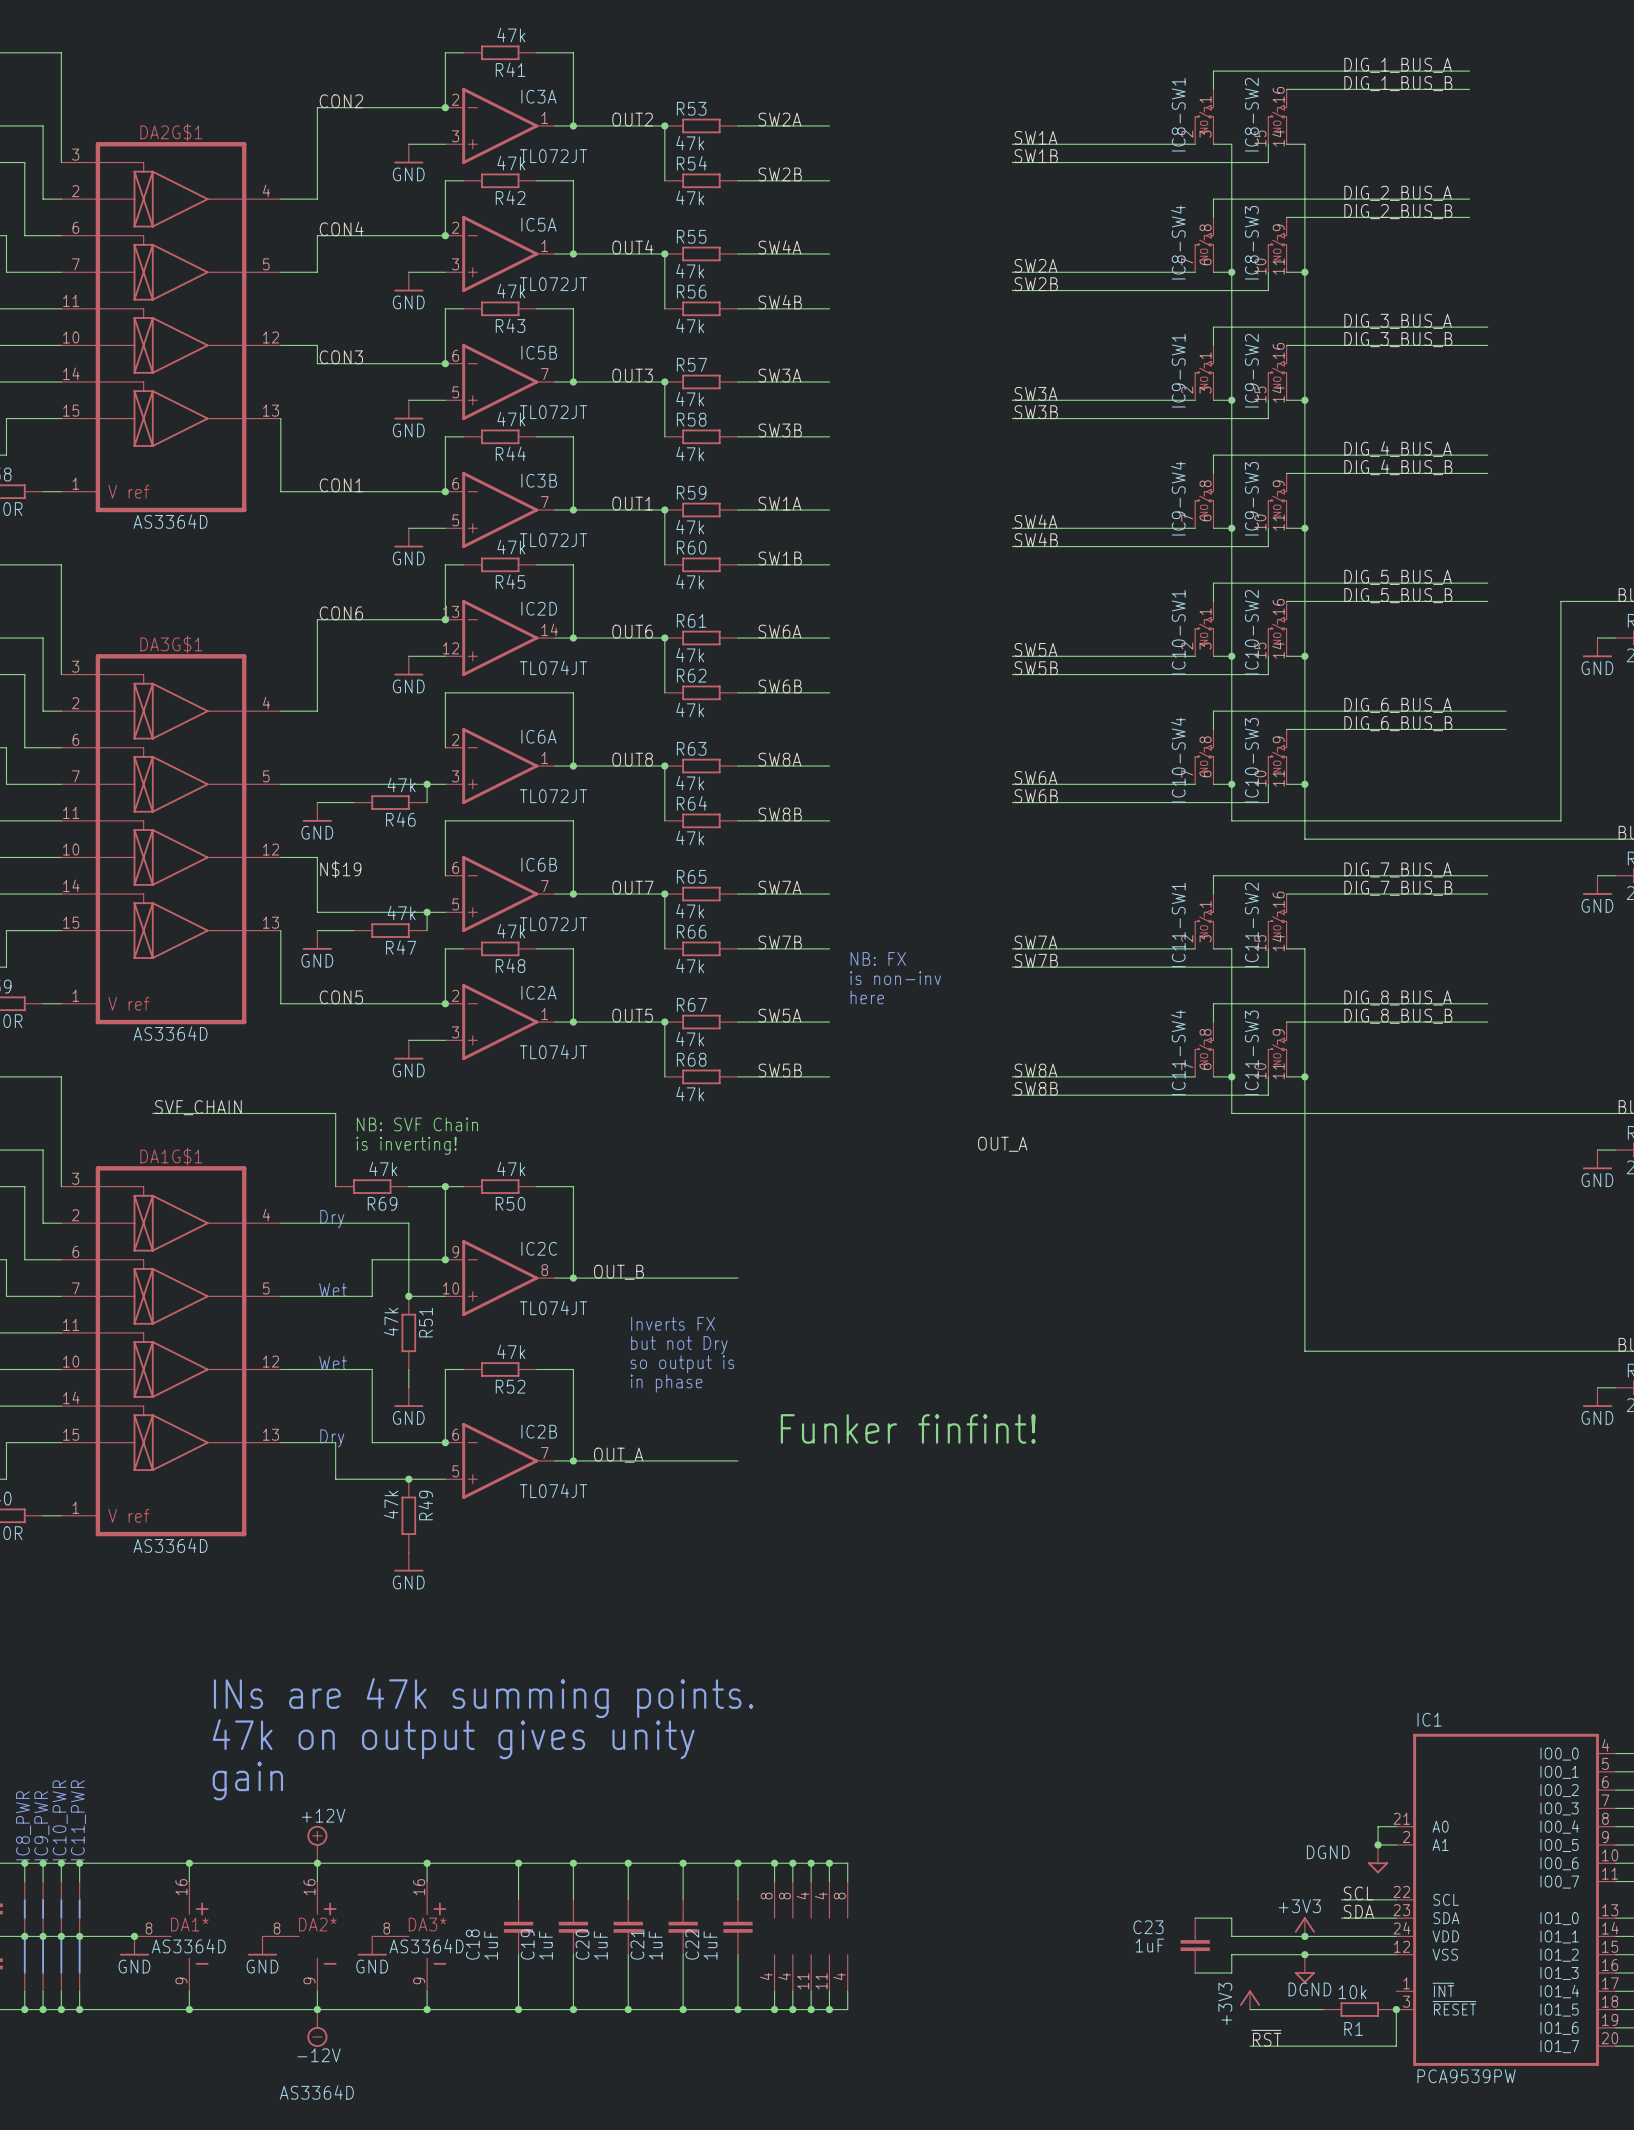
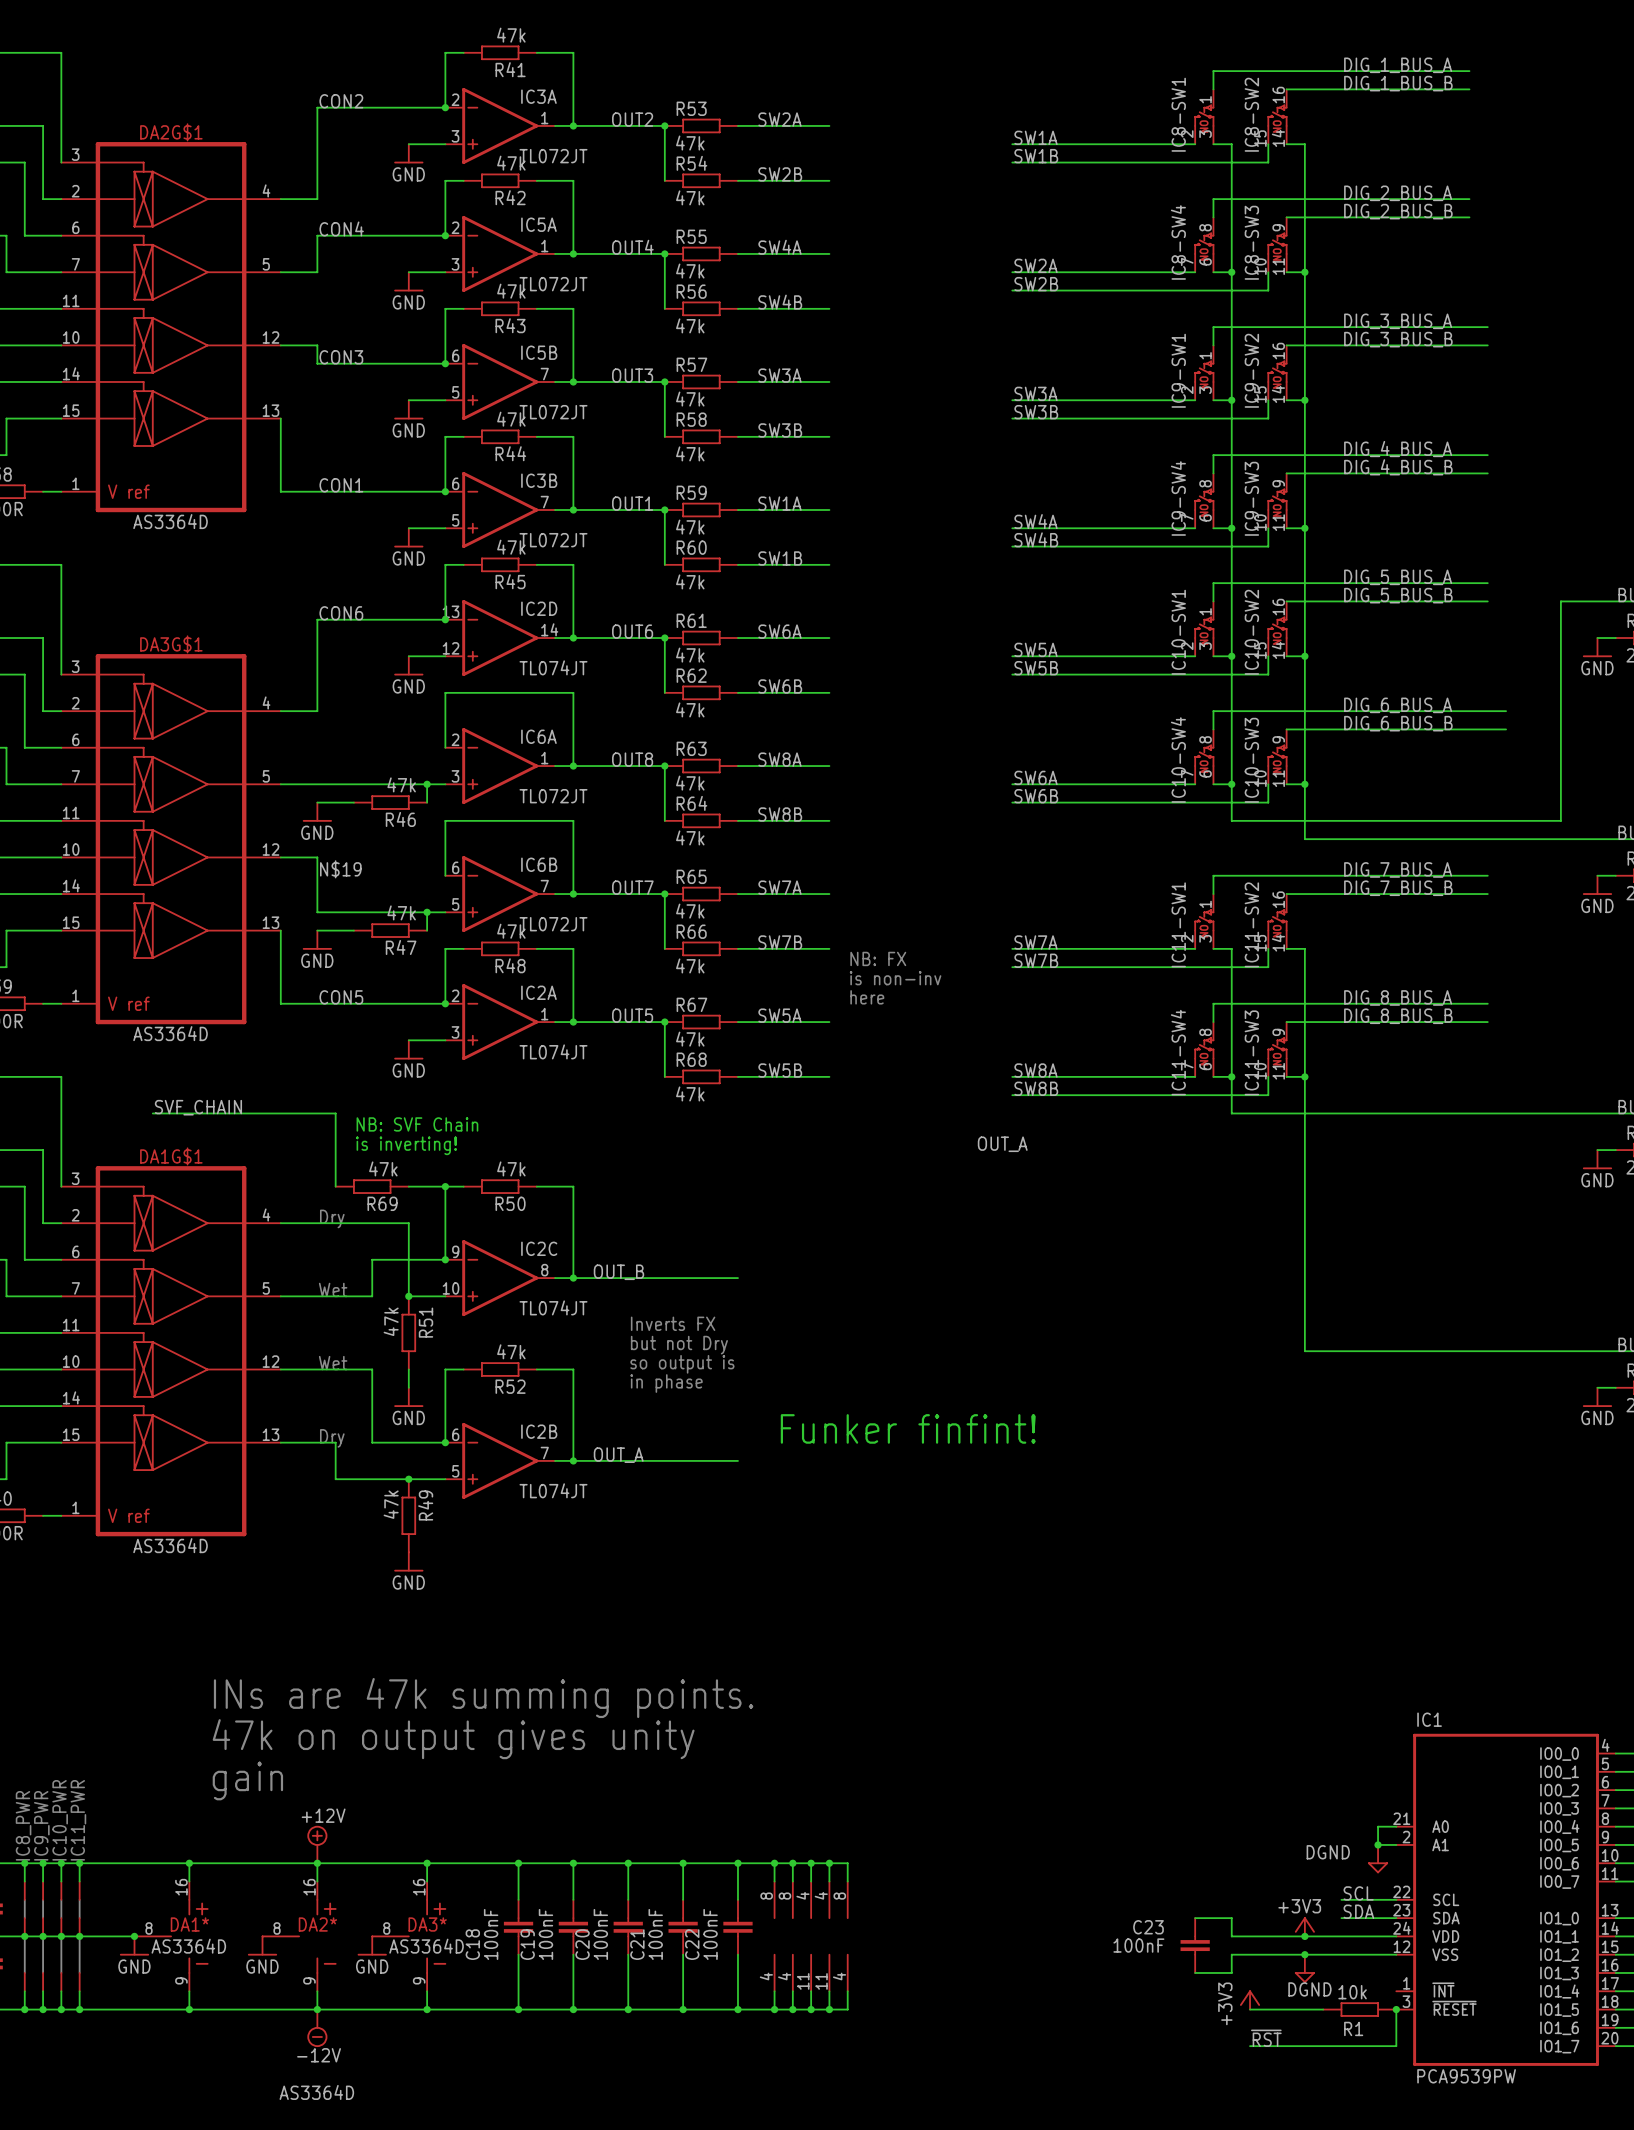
C18 value: 1uF (491, 1945) -> 100nF (491, 1934)
C19 value: 1uF (545, 1945) -> 100nF (545, 1934)
C20 value: 1uF (600, 1945) -> 100nF (600, 1934)
C21 value: 1uF (655, 1945) -> 100nF (655, 1934)
C22 value: 1uF (710, 1945) -> 100nF (710, 1934)
C23 value: 1uF (1149, 1945) -> 100nF (1138, 1945)

